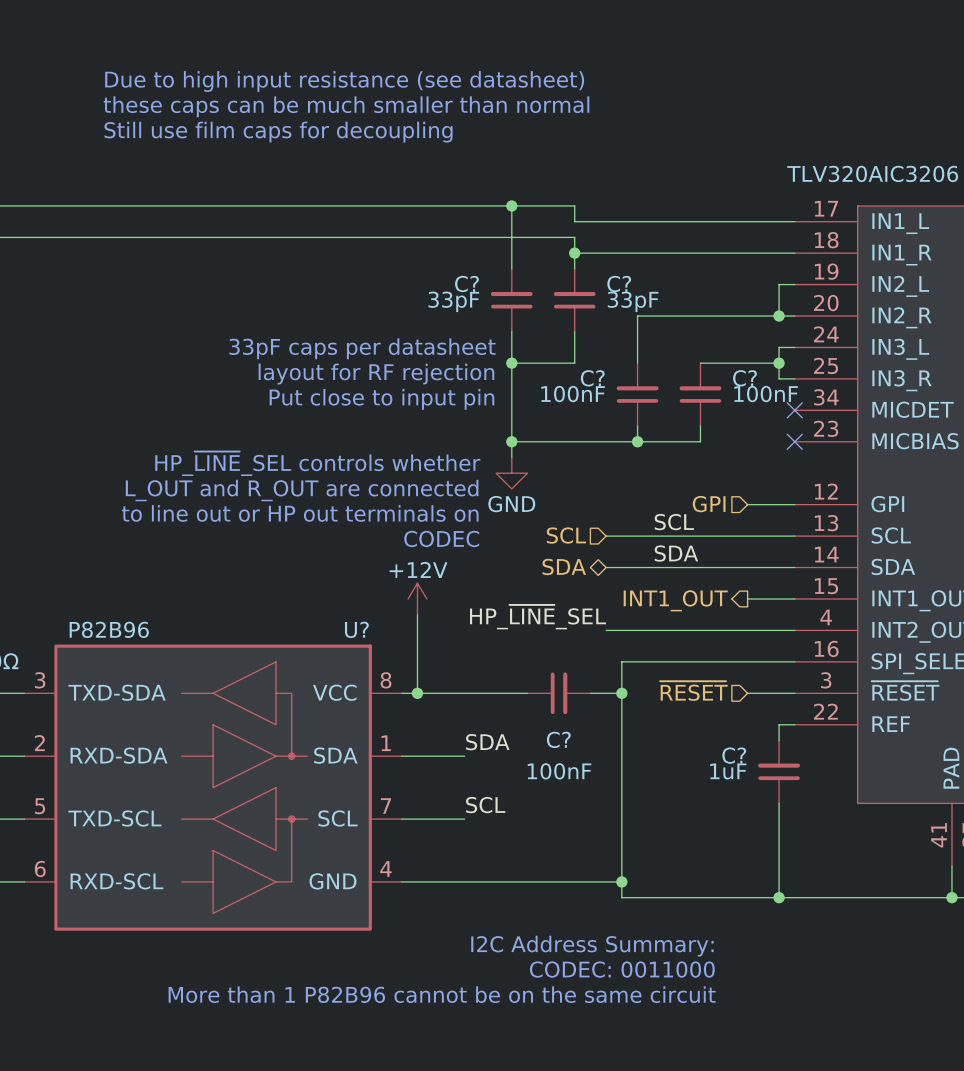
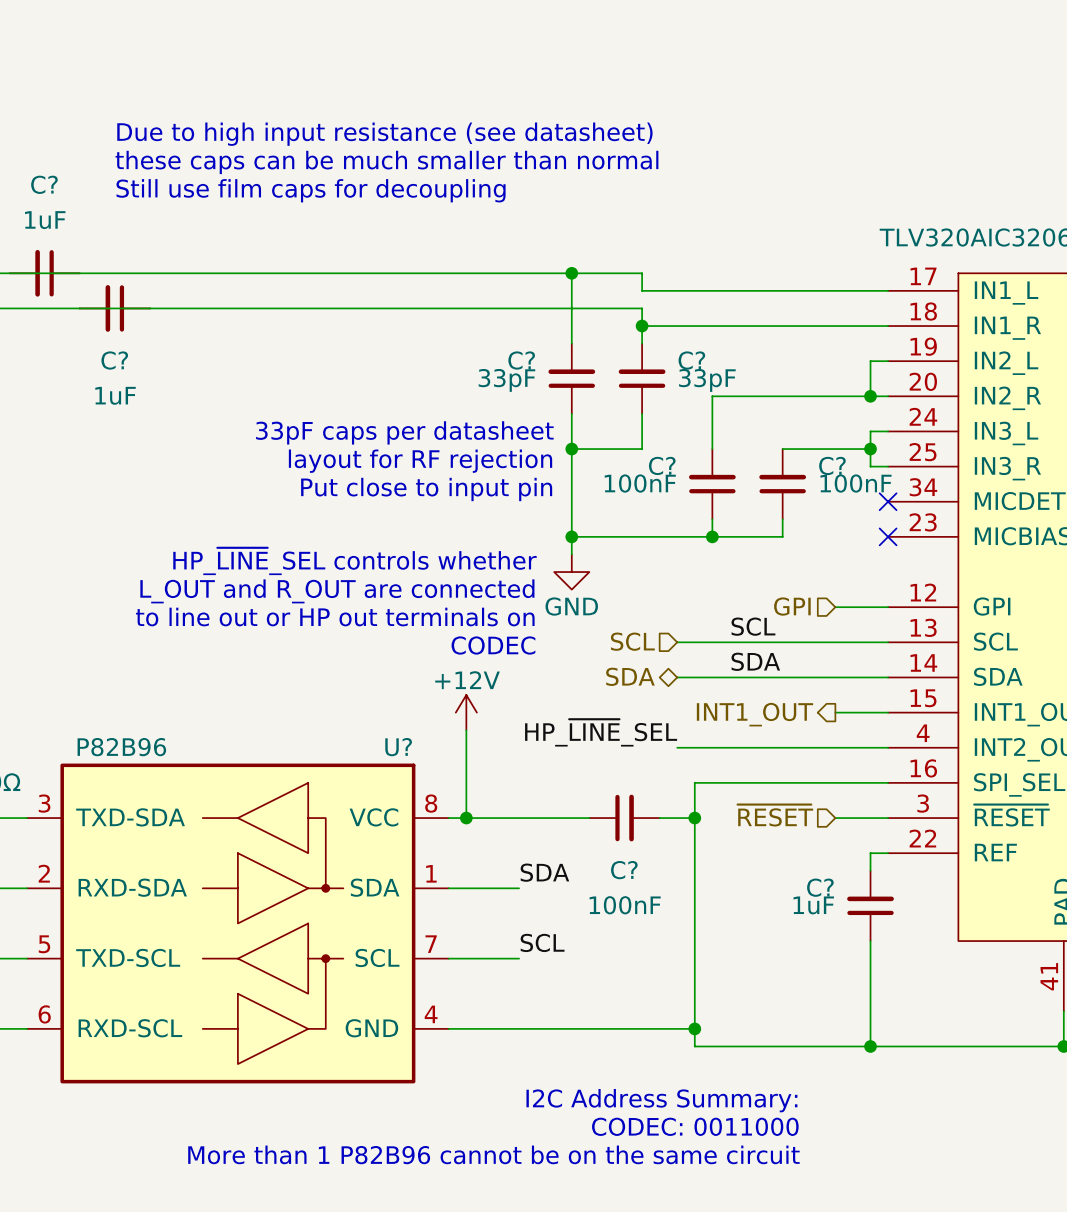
C?: none -> 1uF (44, 273)
C?: none -> 1uF (114, 308)

